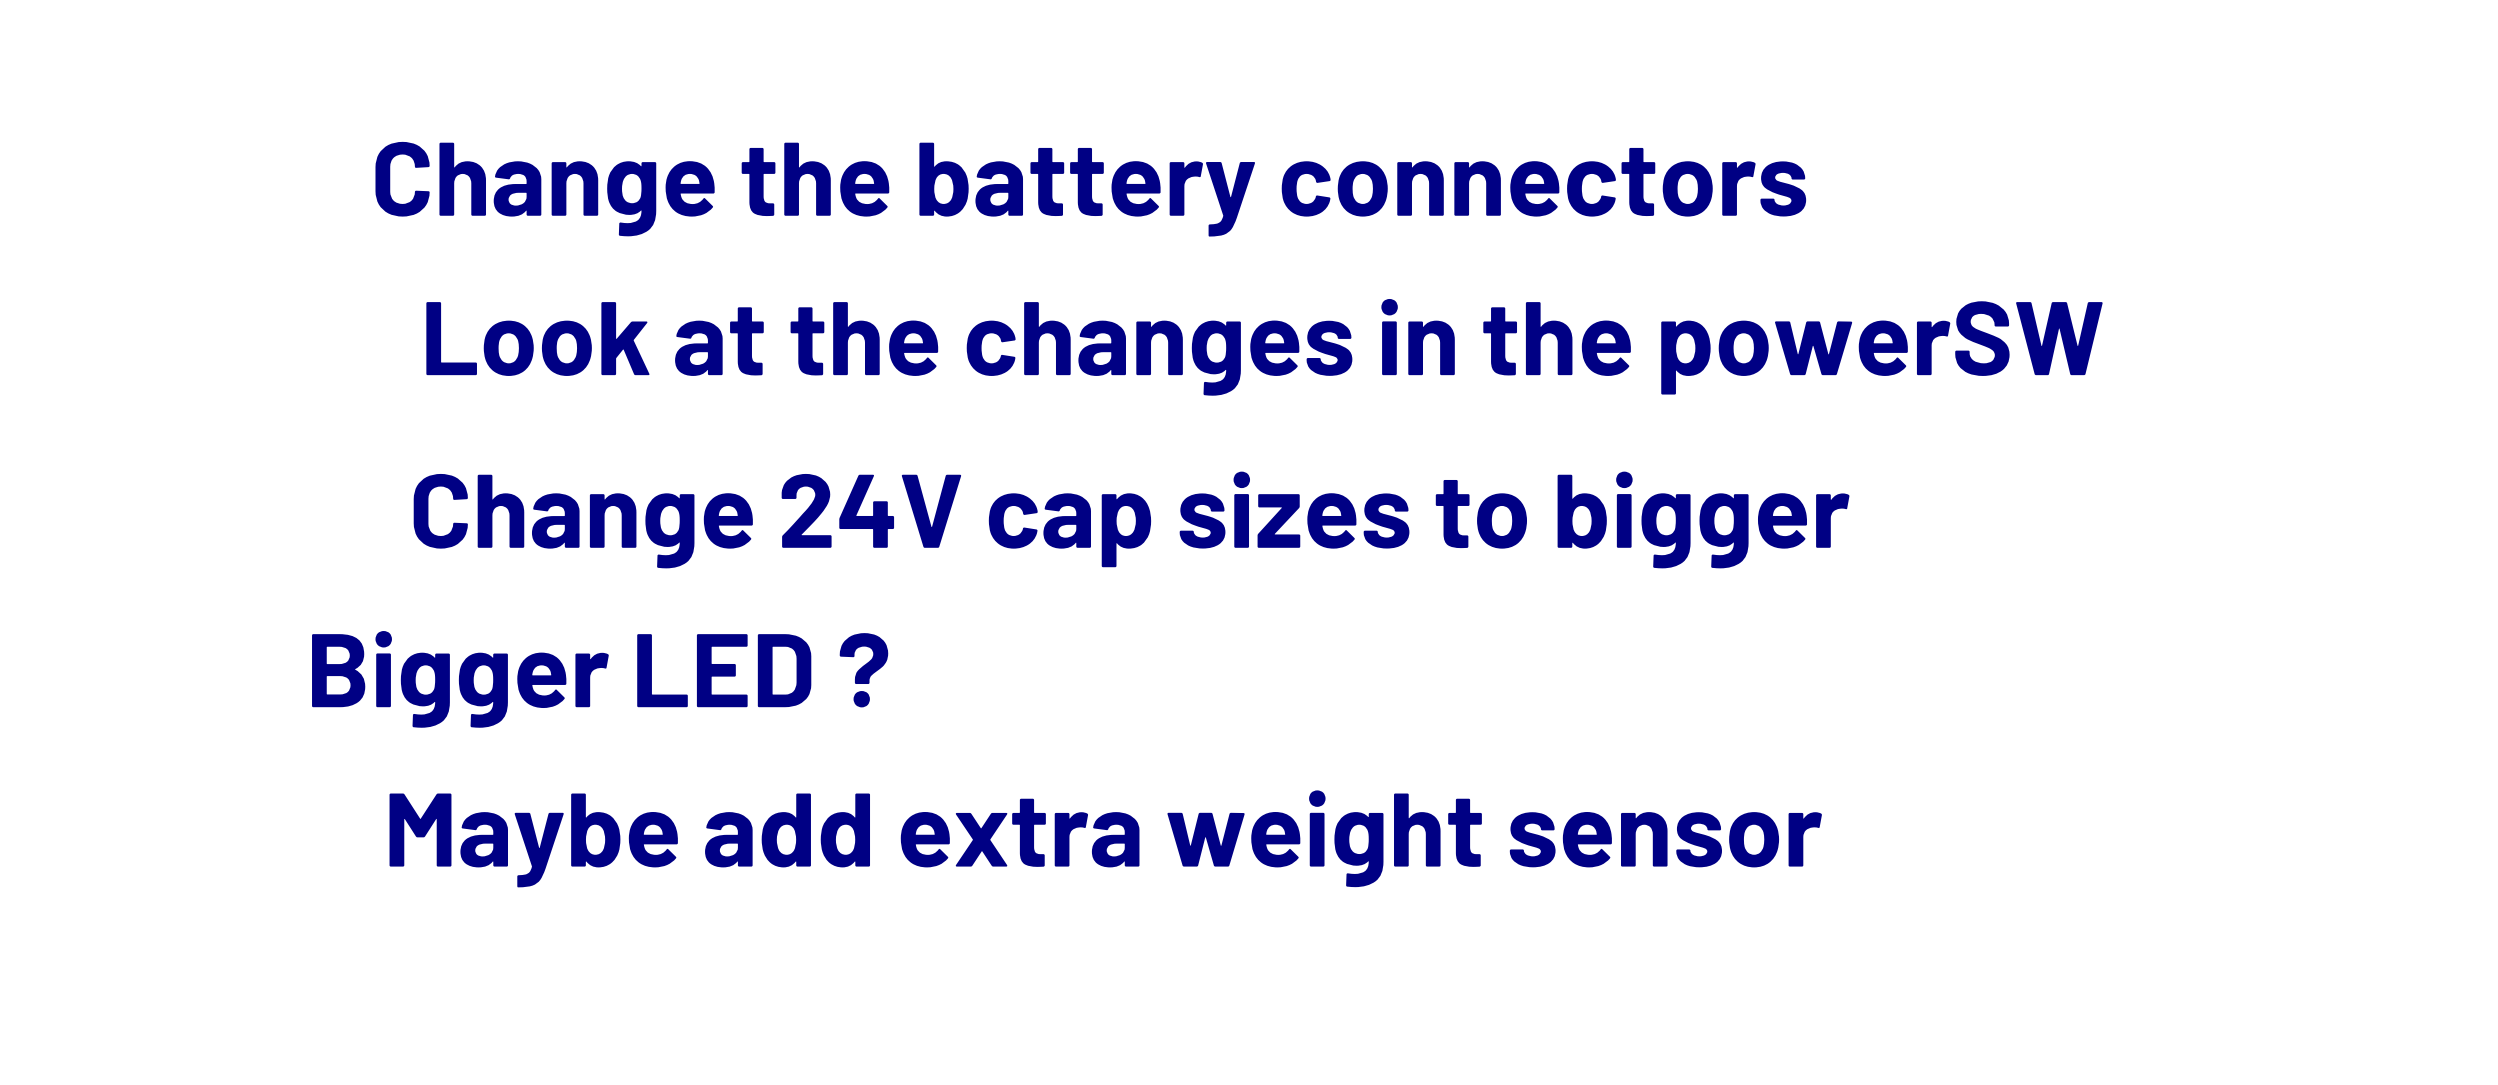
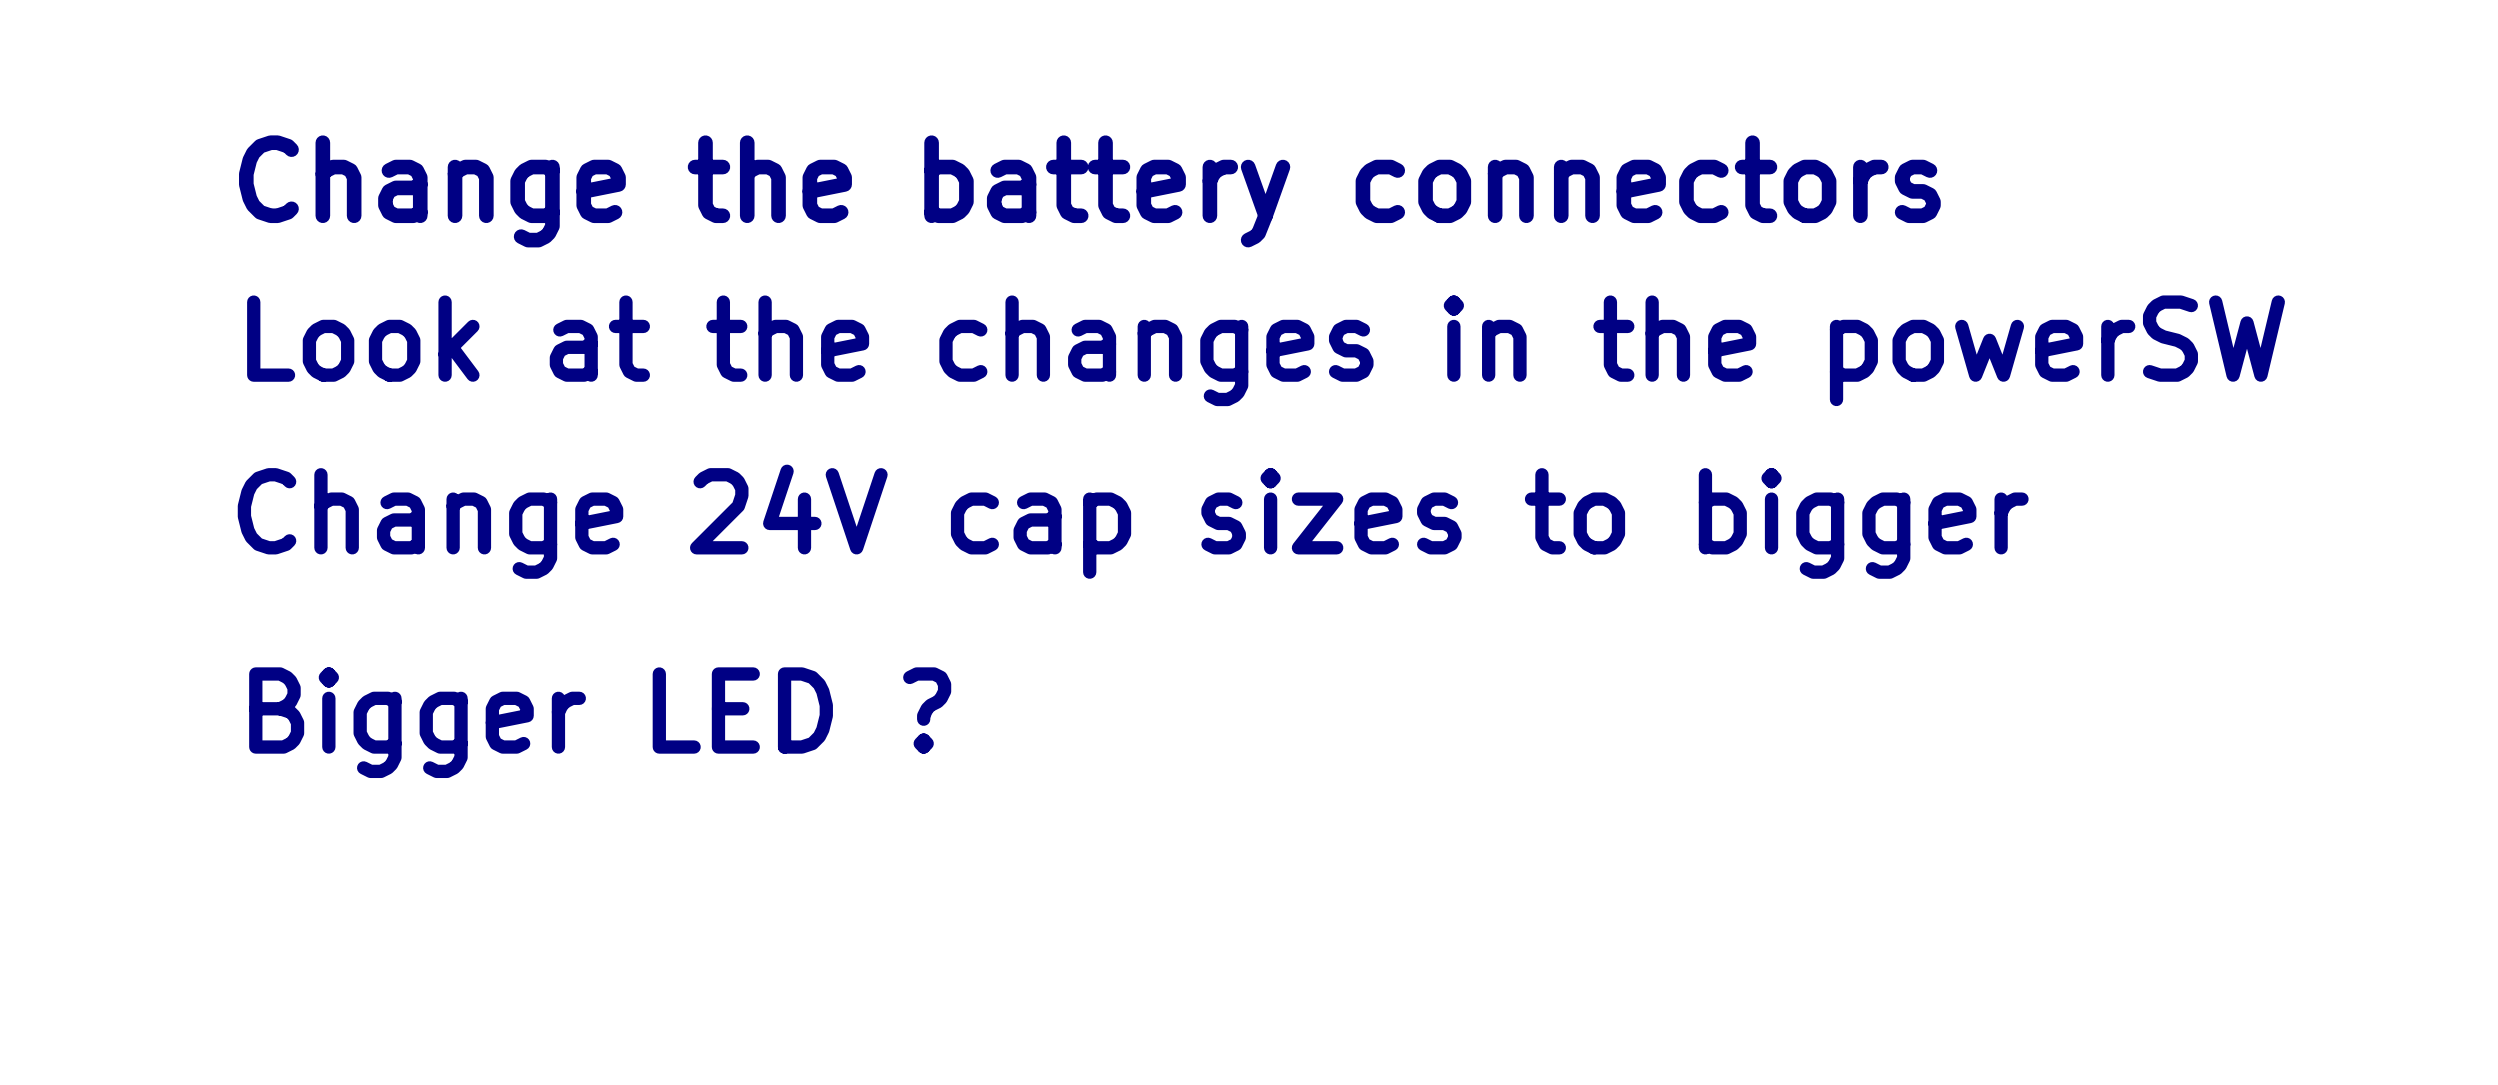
text position: Bigger LED ? (600, 679) -> Bigger LED ? (600, 722)
text: Maybe add extra weight sensor (1105, 838) -> none

